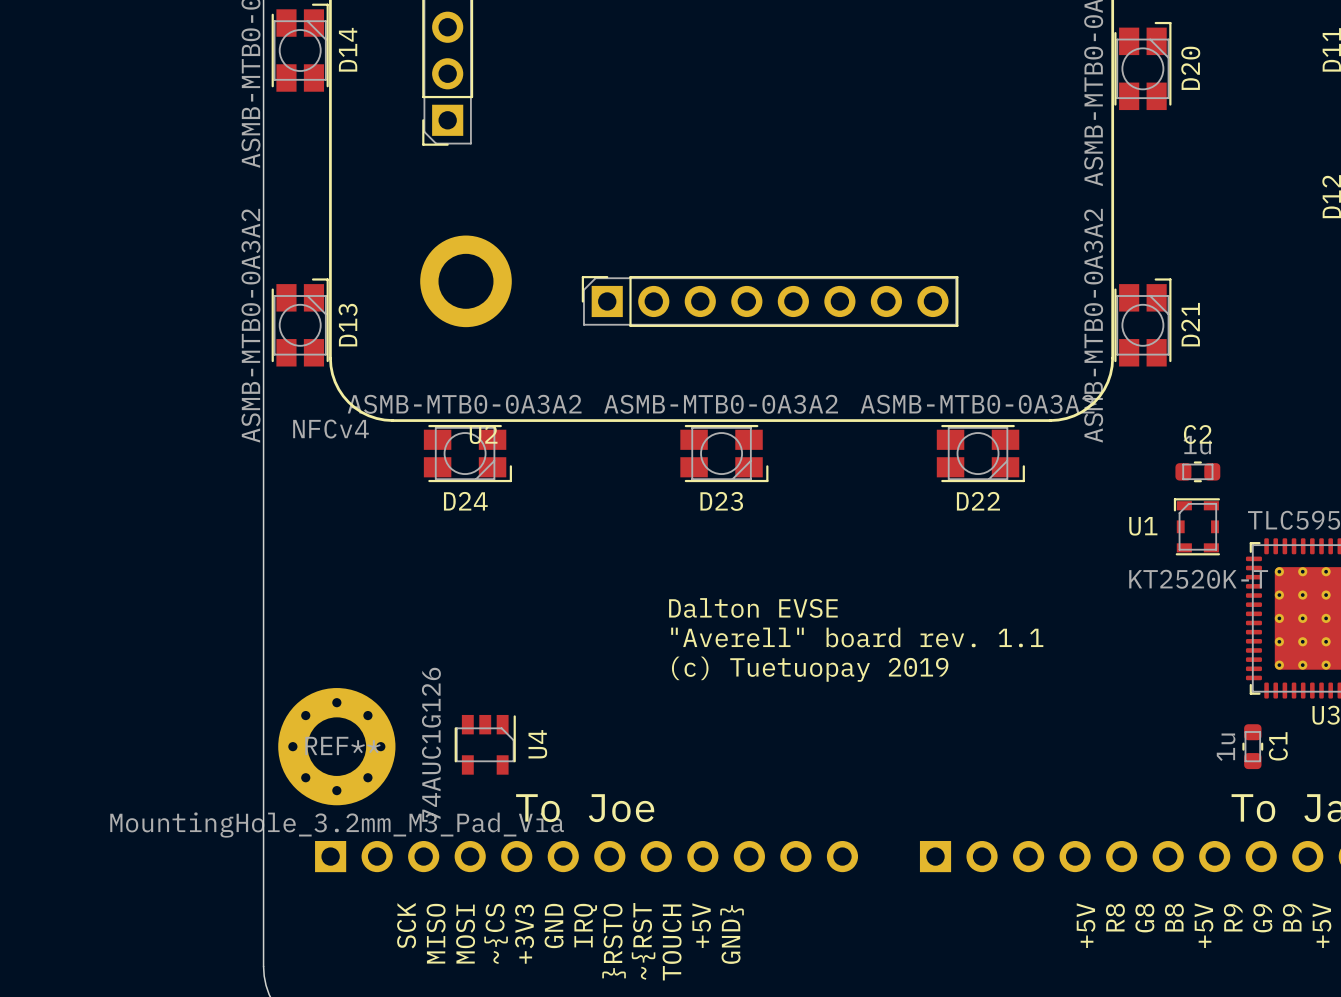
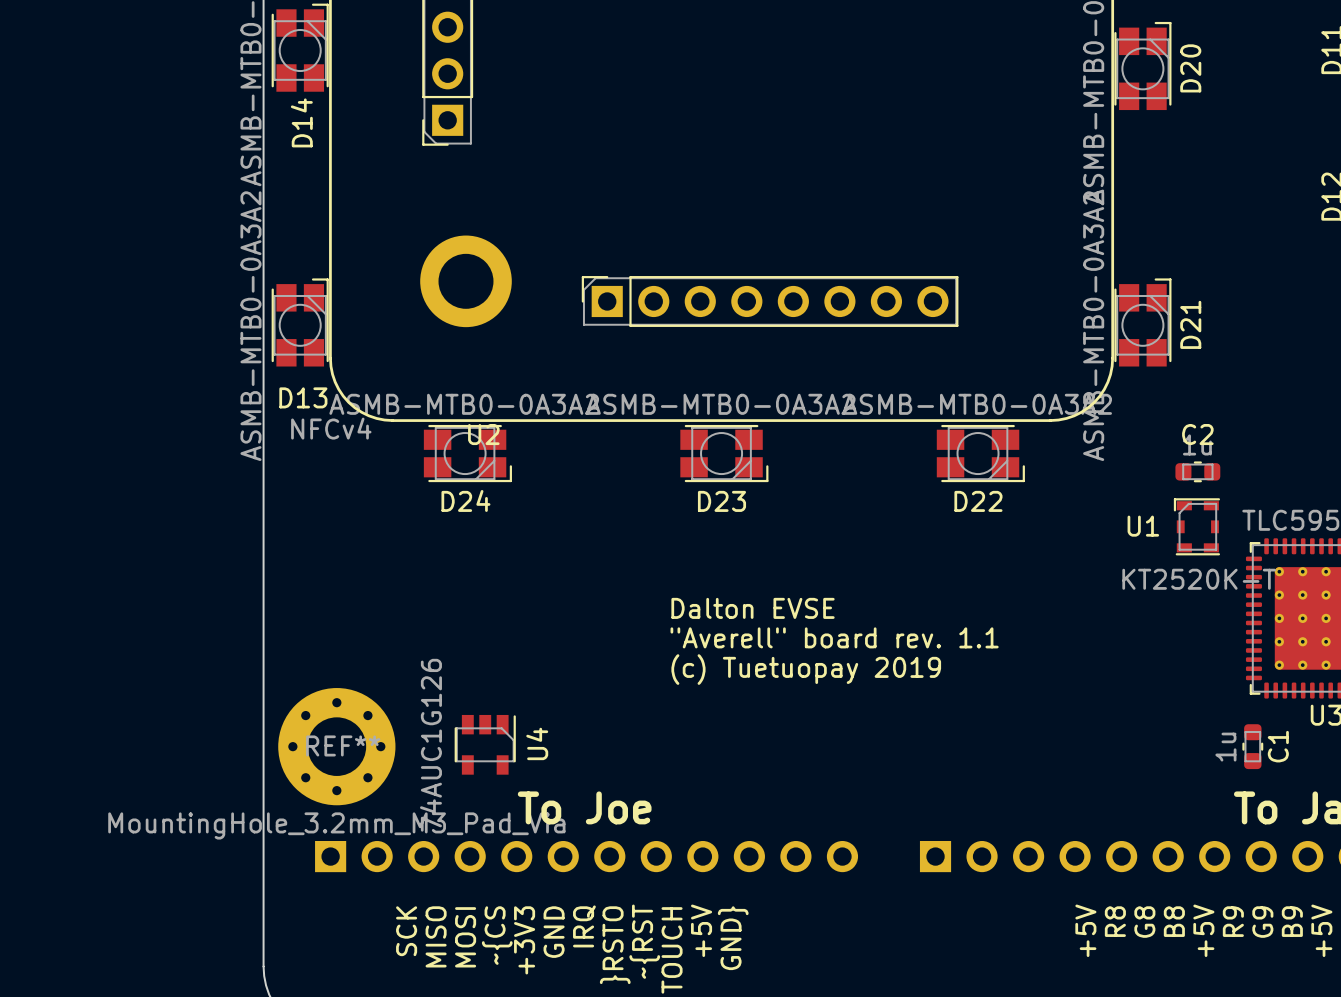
D14 name position: D14 (348, 49) -> D14 (301, 122)
D13 name rotation: 0° (348, 325) -> 90° clockwise (303, 397)
D13 name position: D13 (348, 325) -> D13 (303, 397)

